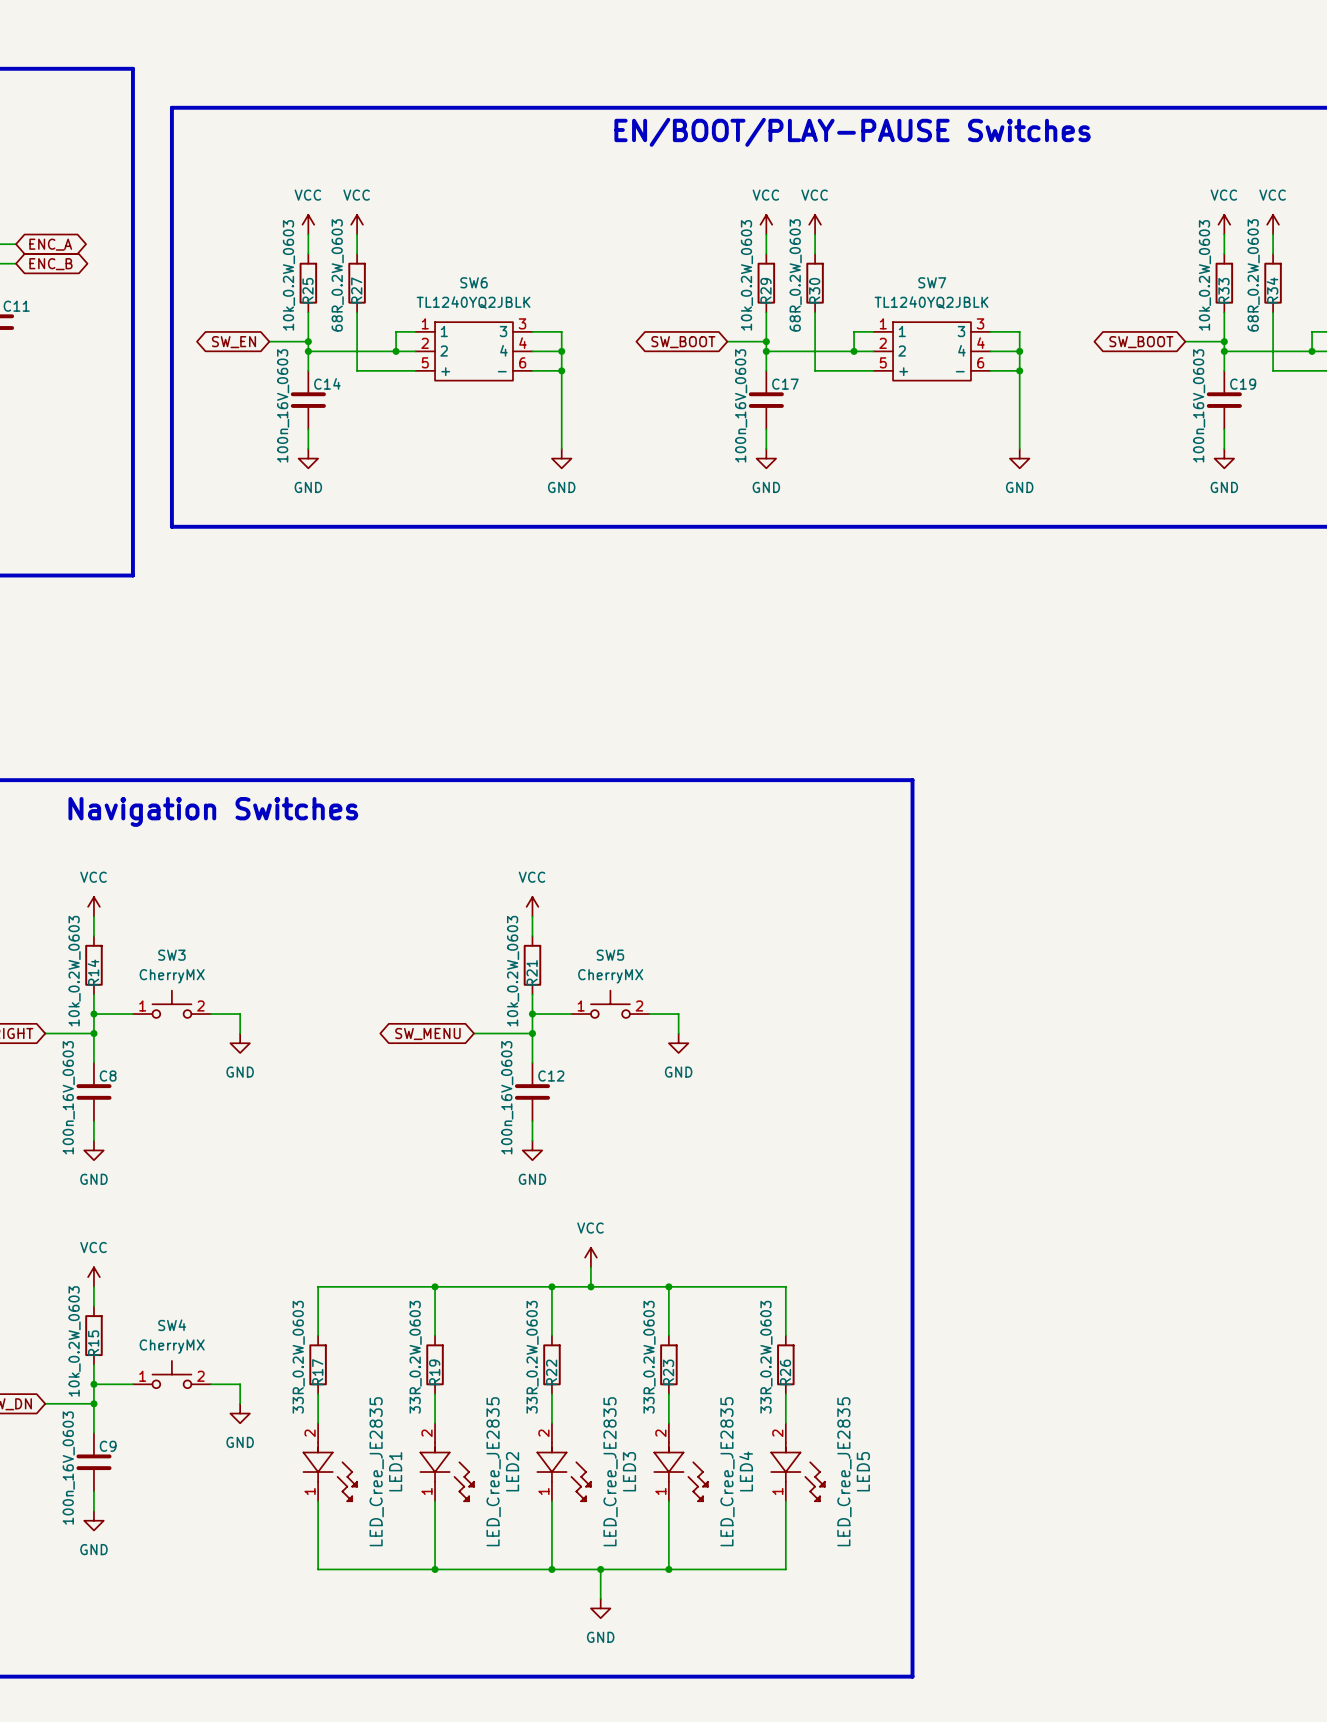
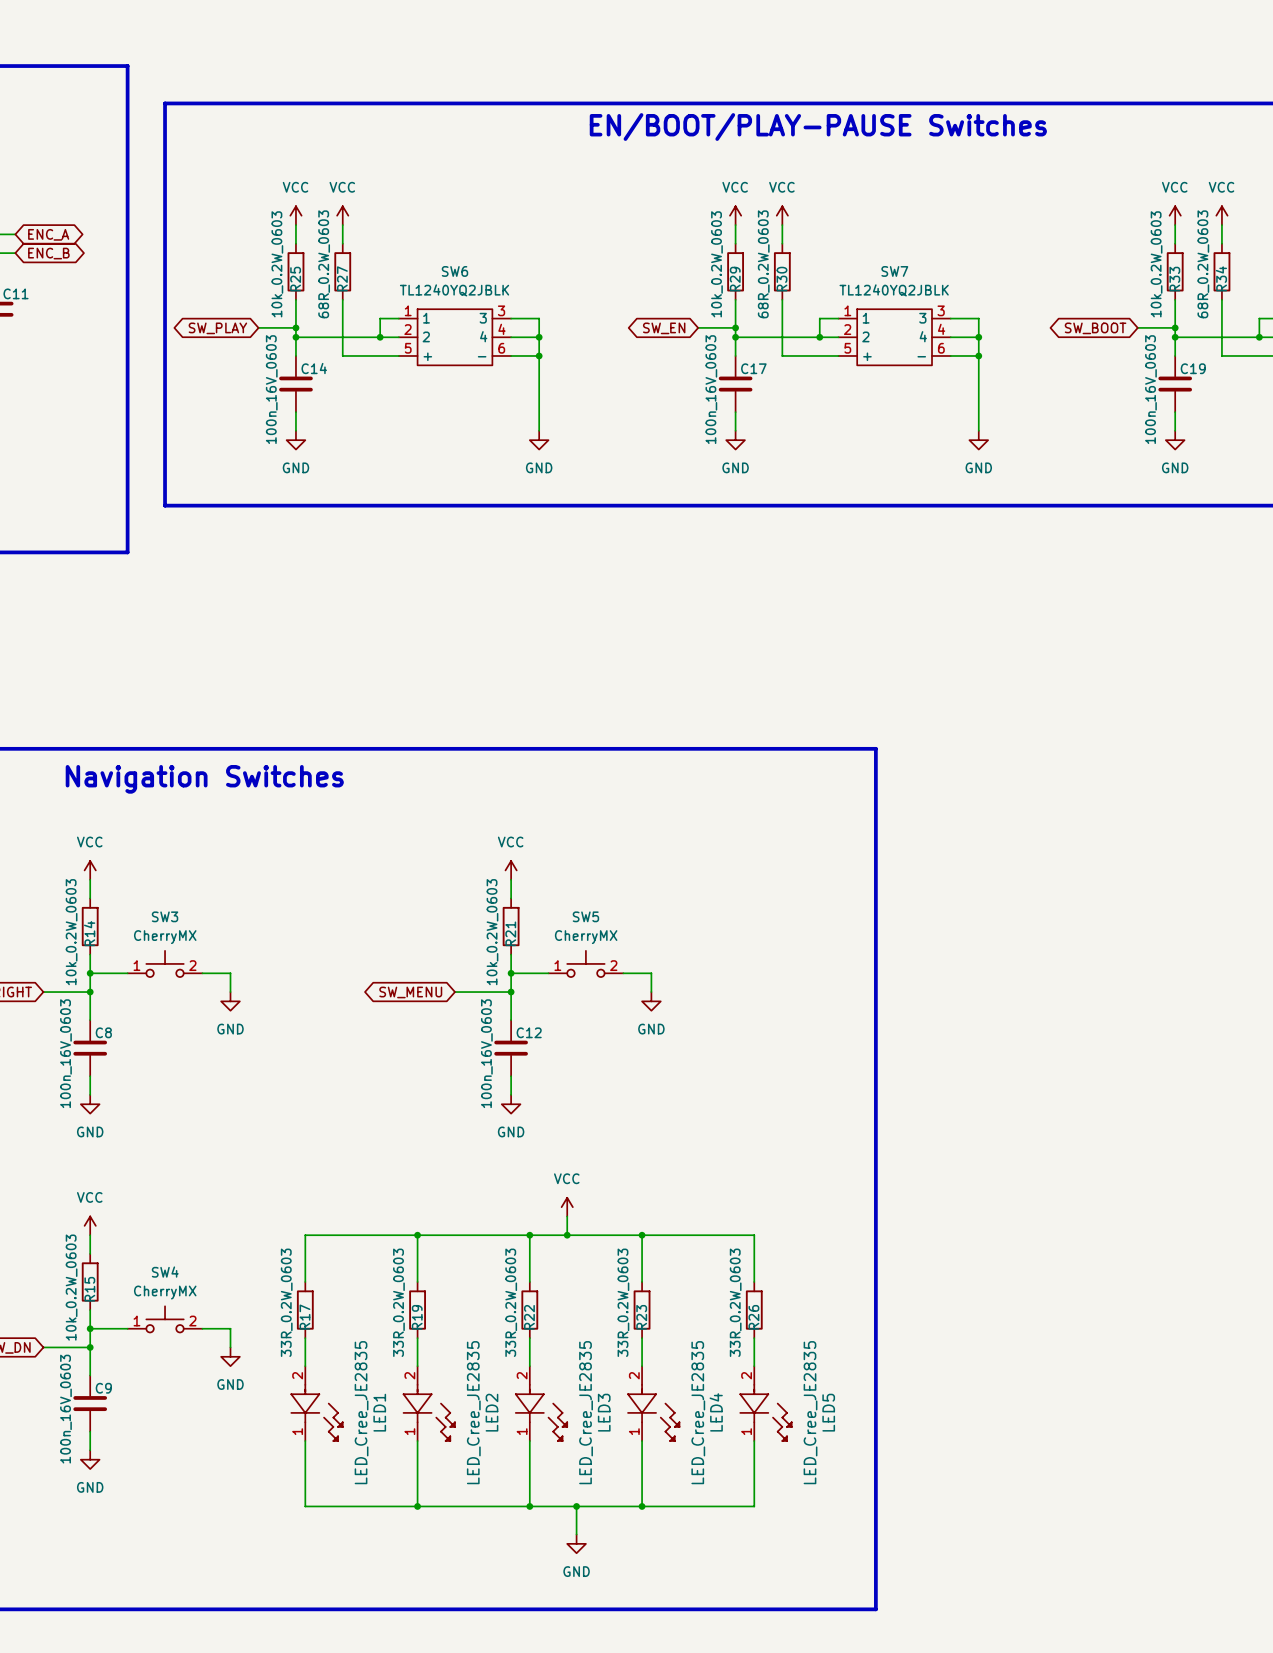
global label: SW_EN (233, 342) -> SW_PLAY (217, 328)
global label: SW_BOOT (683, 342) -> SW_EN (664, 328)

